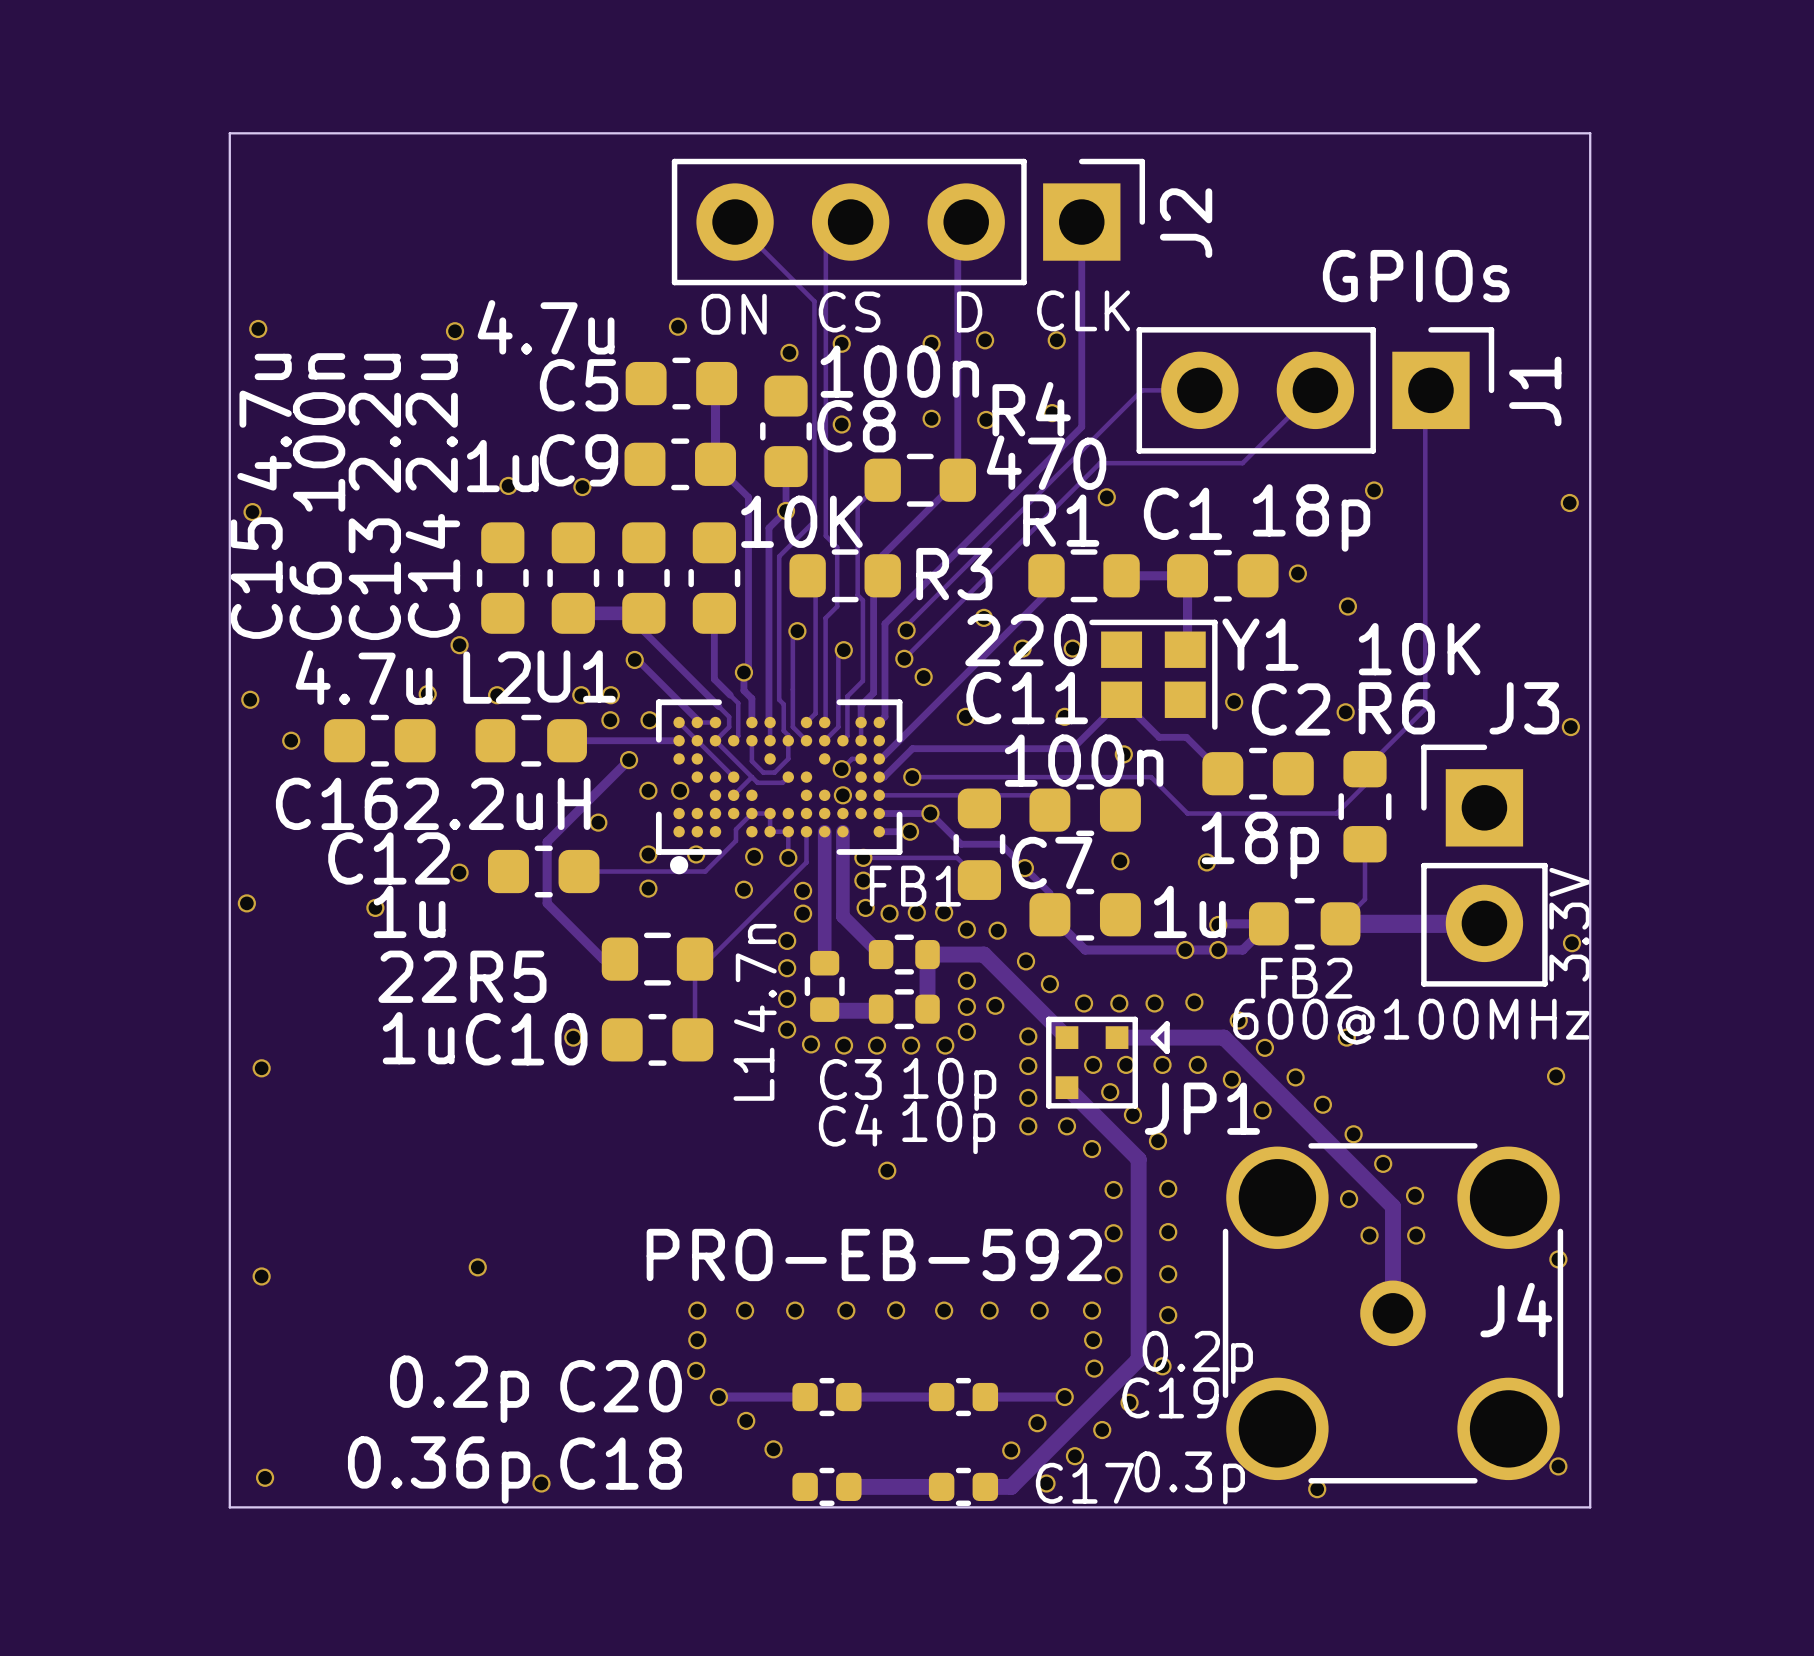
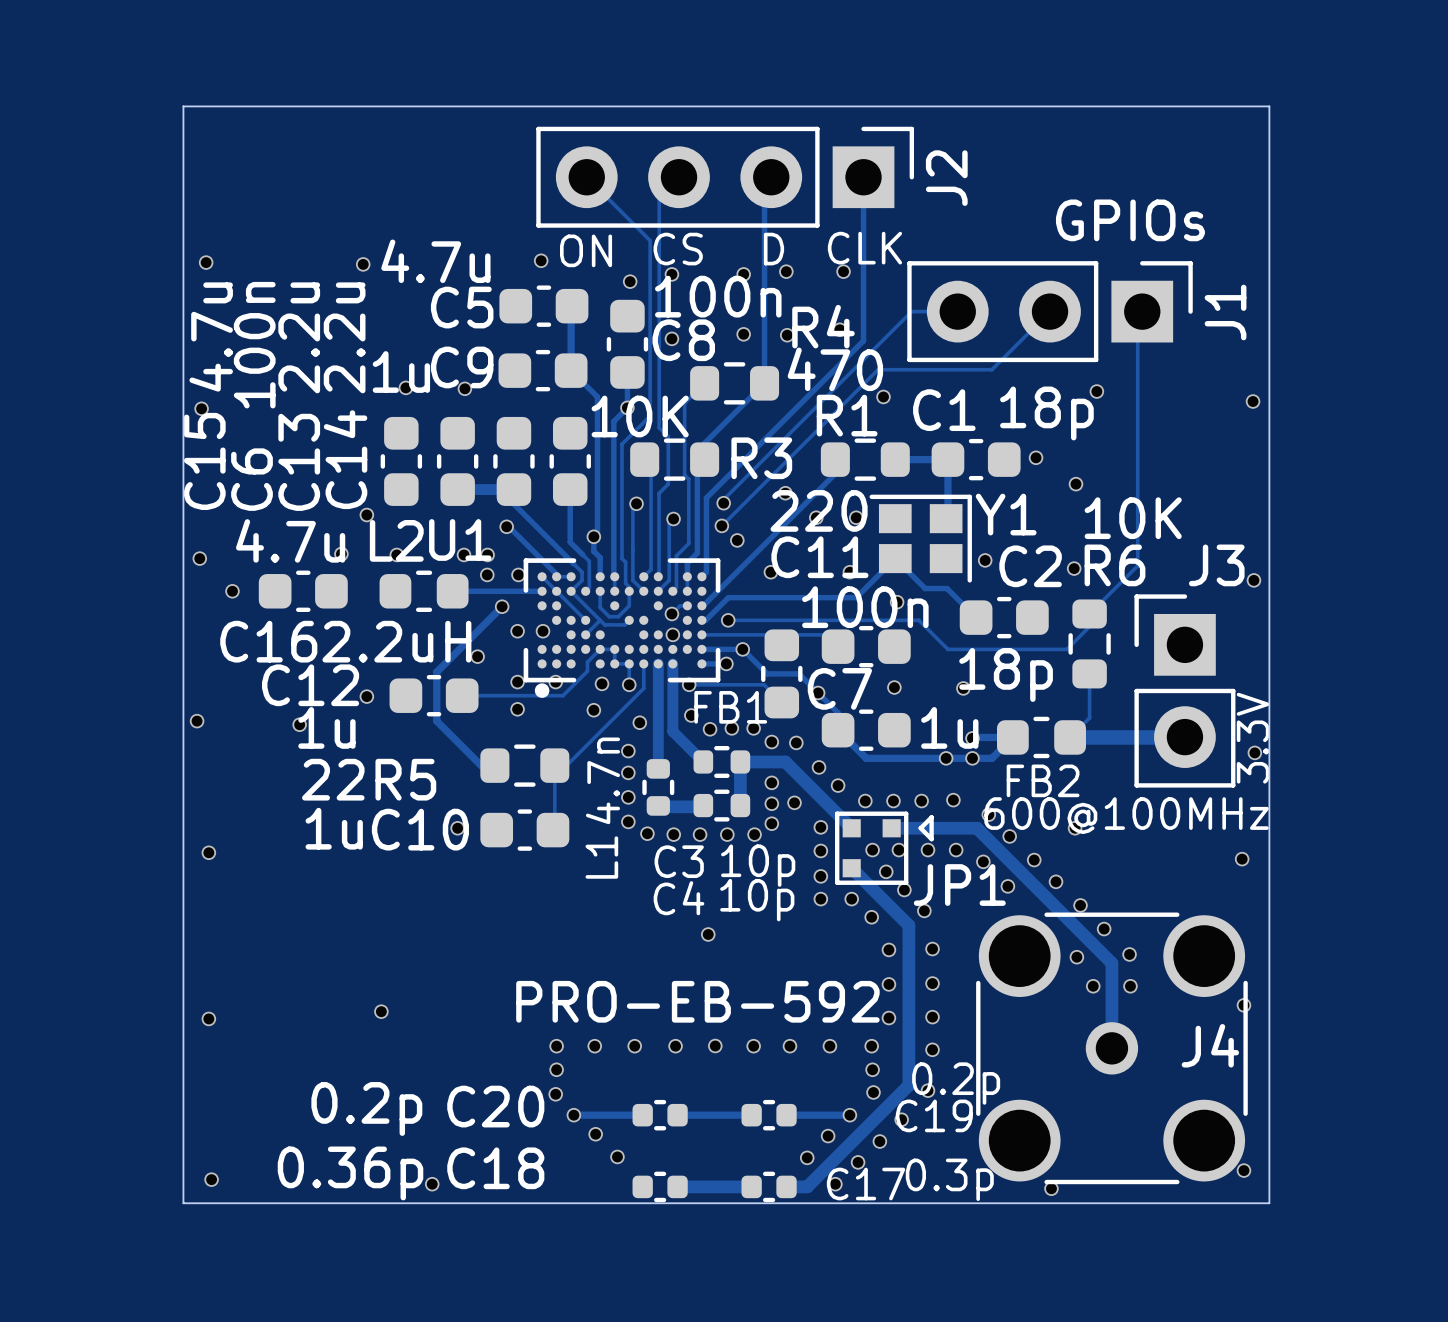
via: (863, 880) -> none
via: (803, 890) -> none
via: none -> (691, 715)
via: none -> (639, 722)
via: (865, 907) -> none
via: (803, 913) -> none

